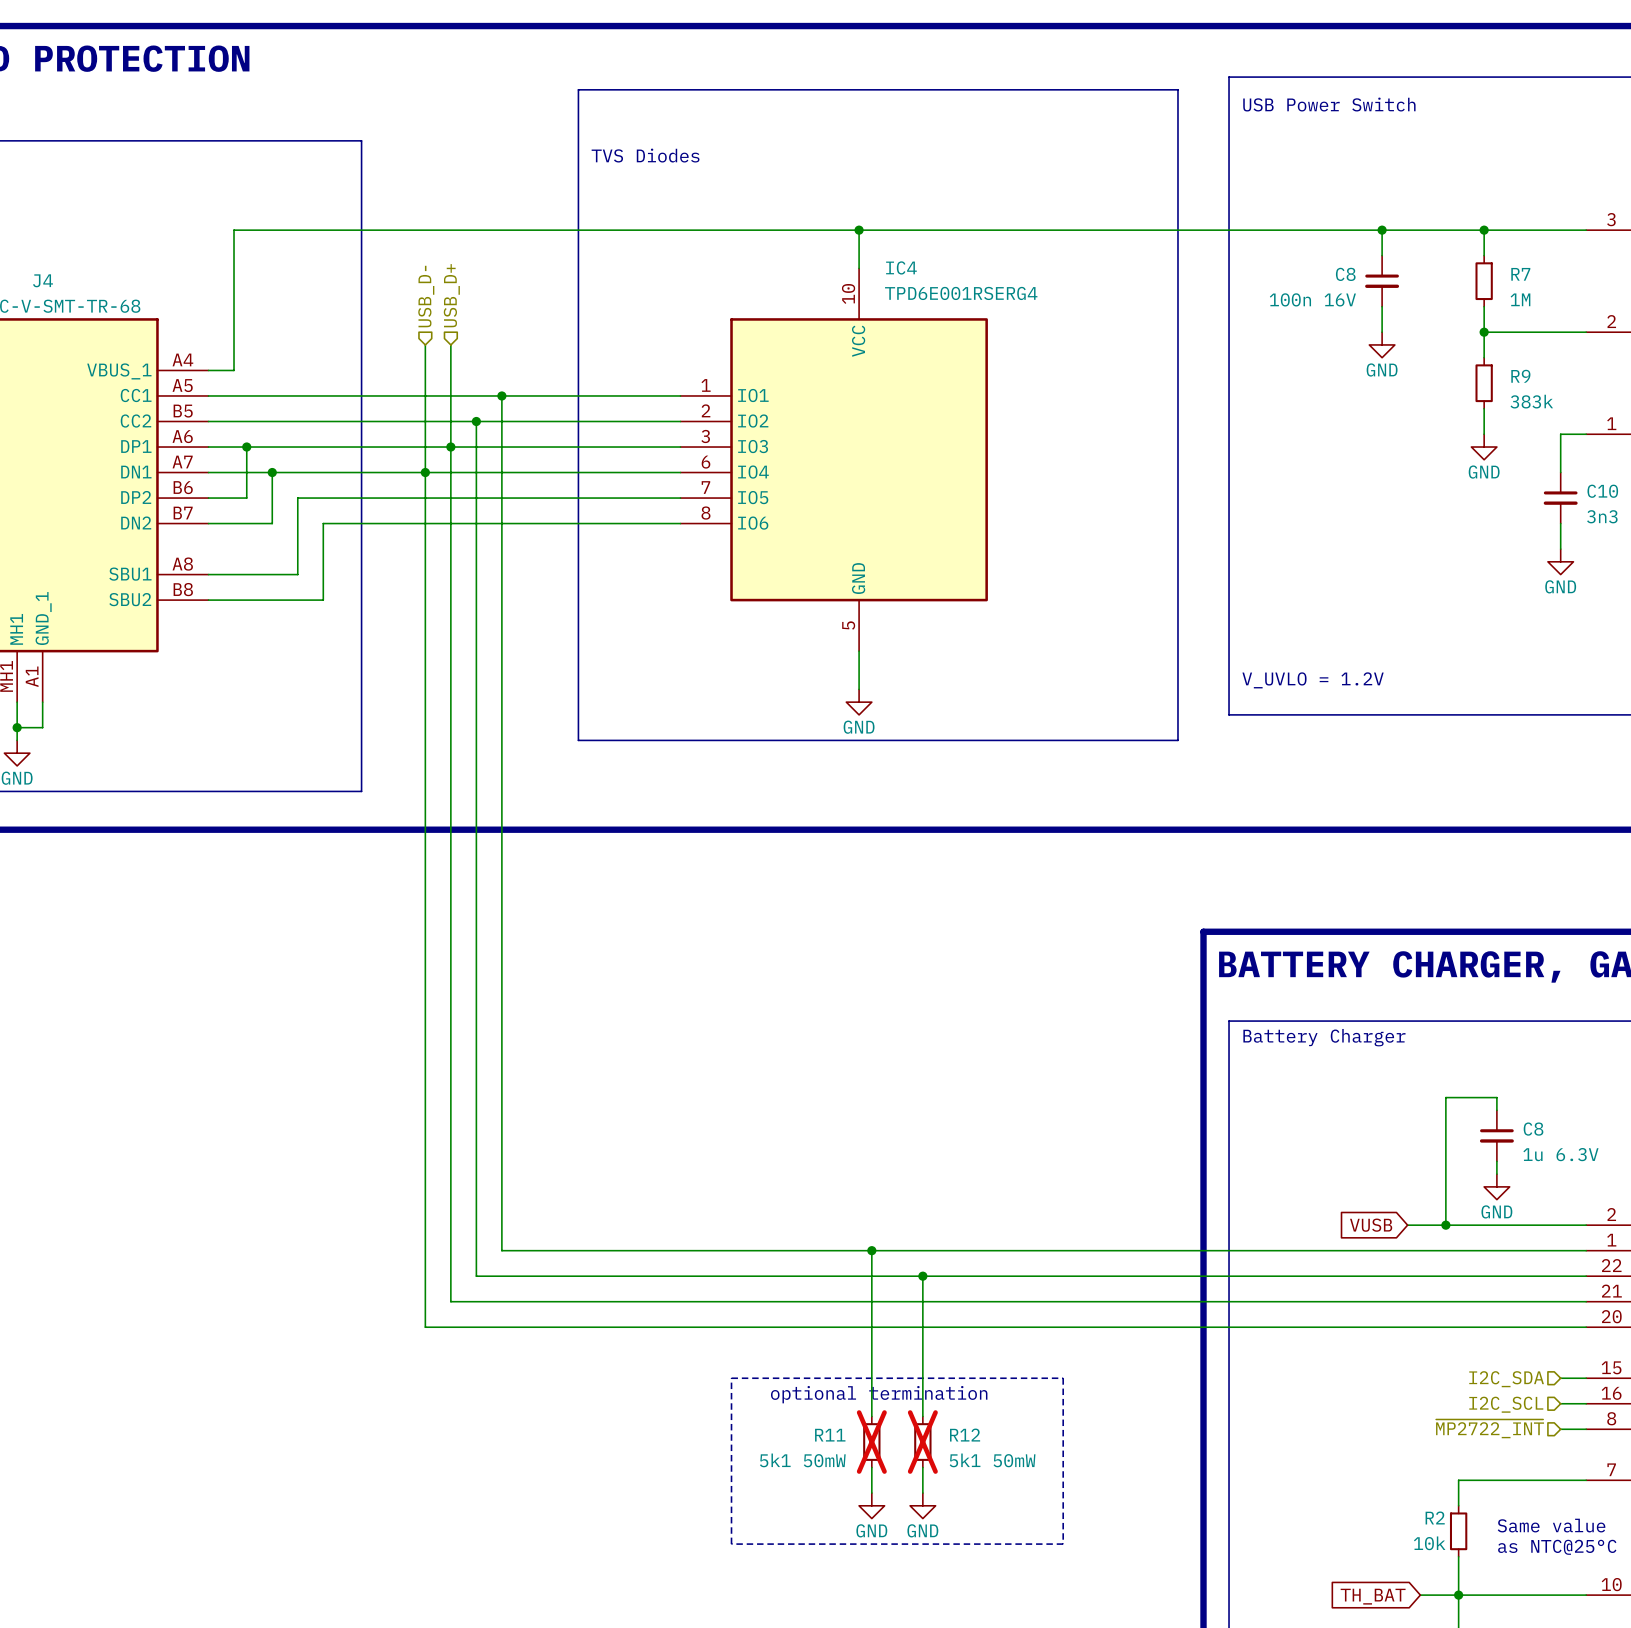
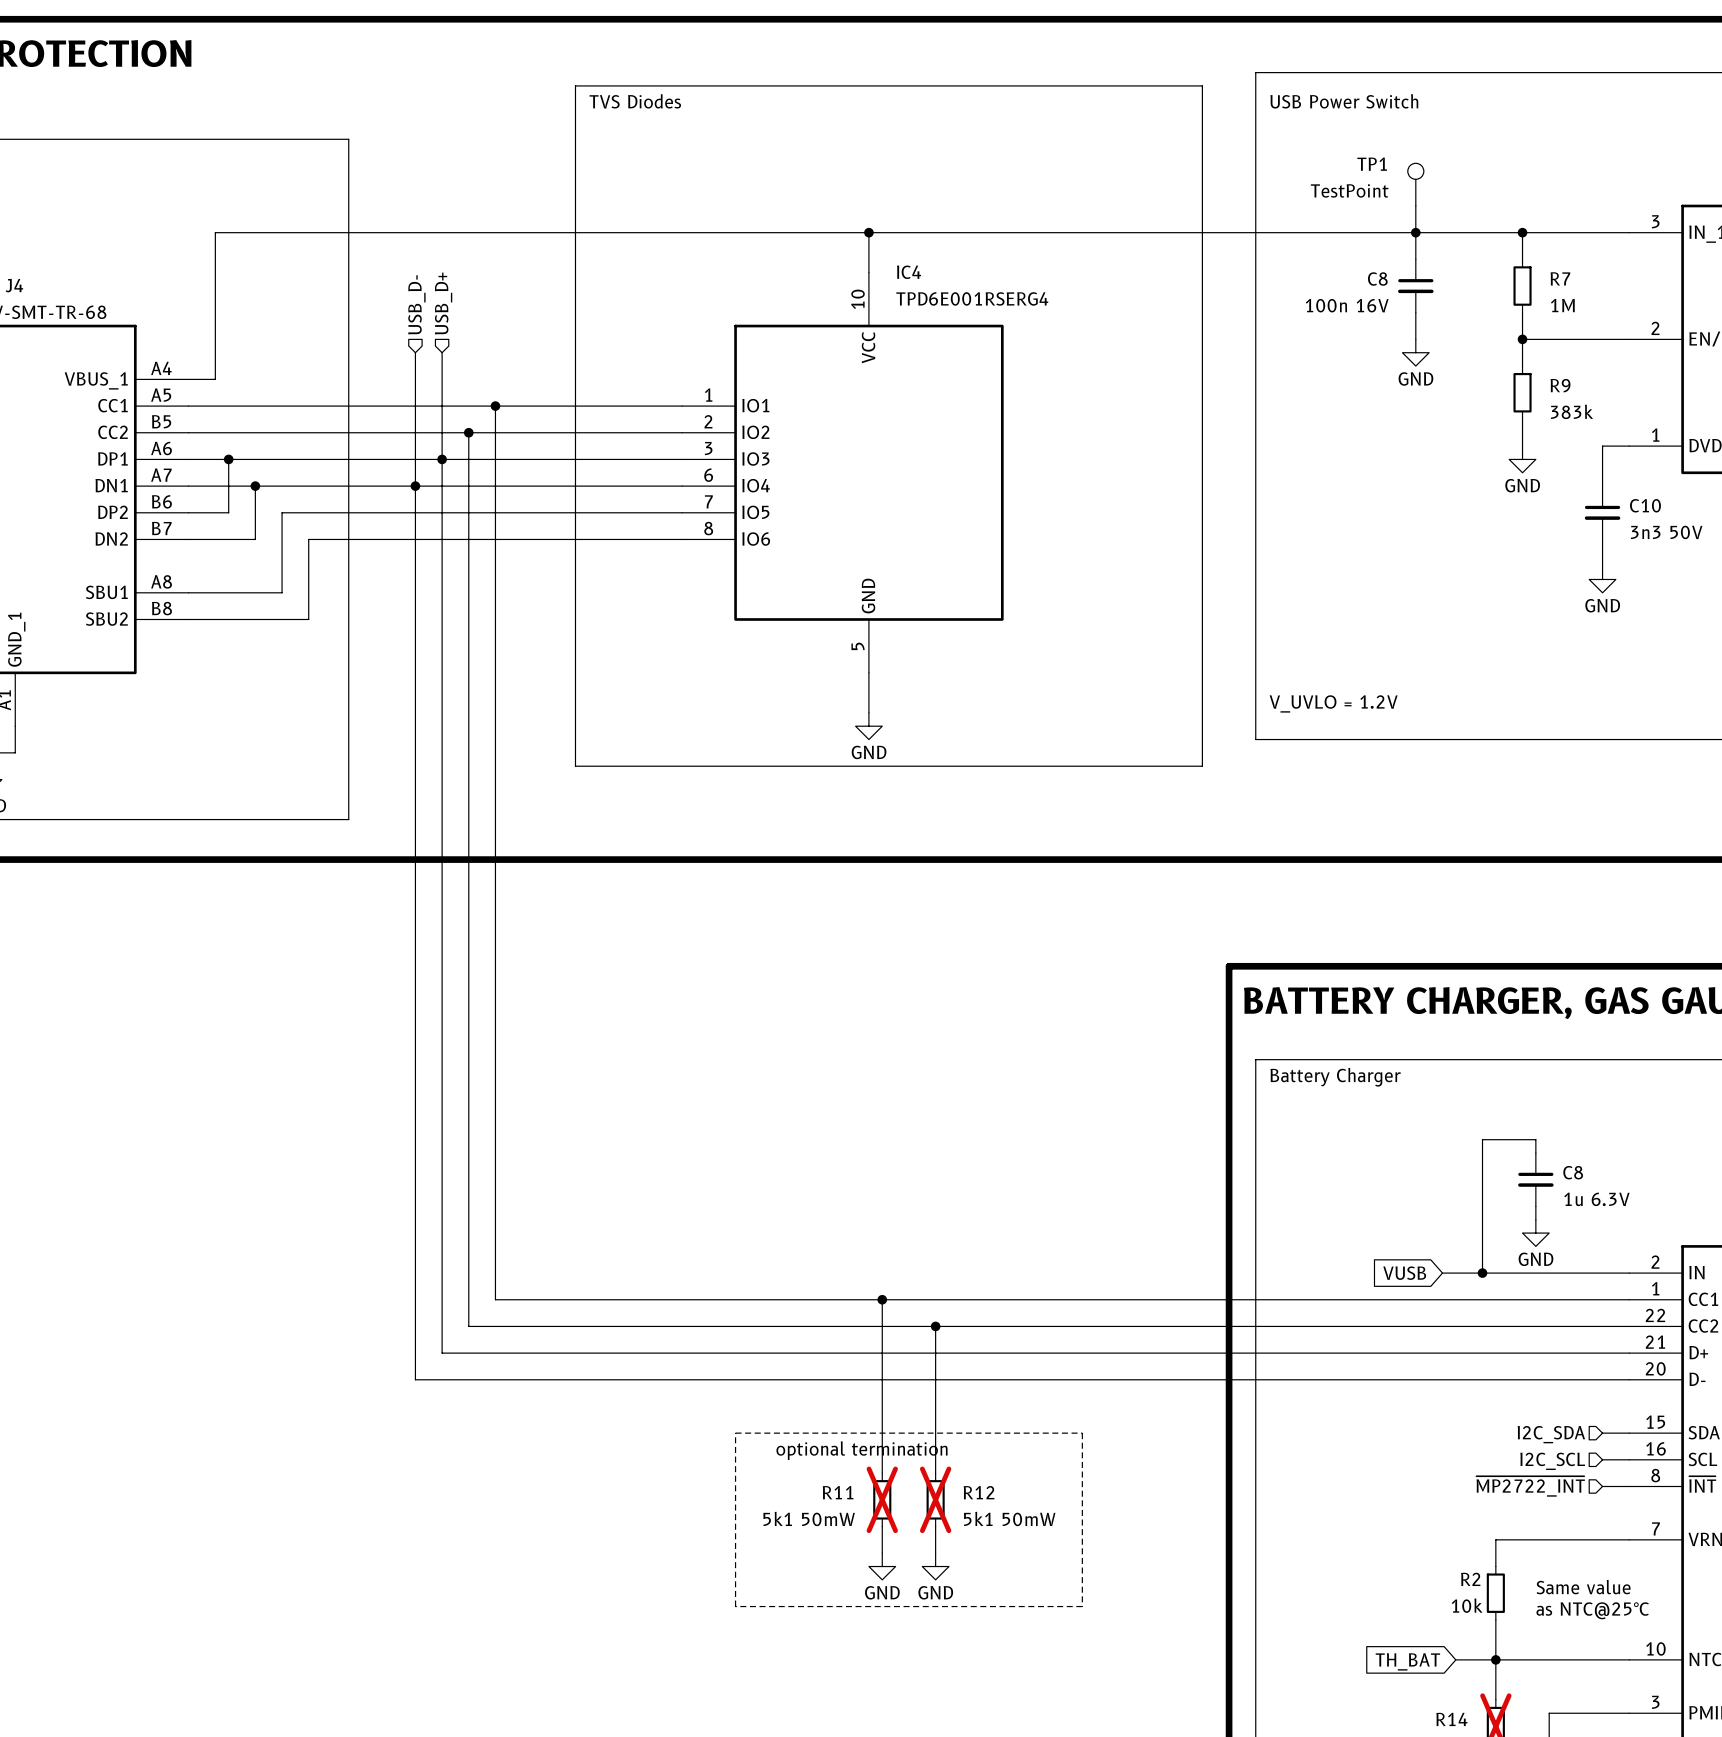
text position: TVS Diodes (645, 155) -> TVS Diodes (635, 101)
TP1: none -> TestPoint (1415, 184)
wire: none -> (1415, 205) (1415, 232)

